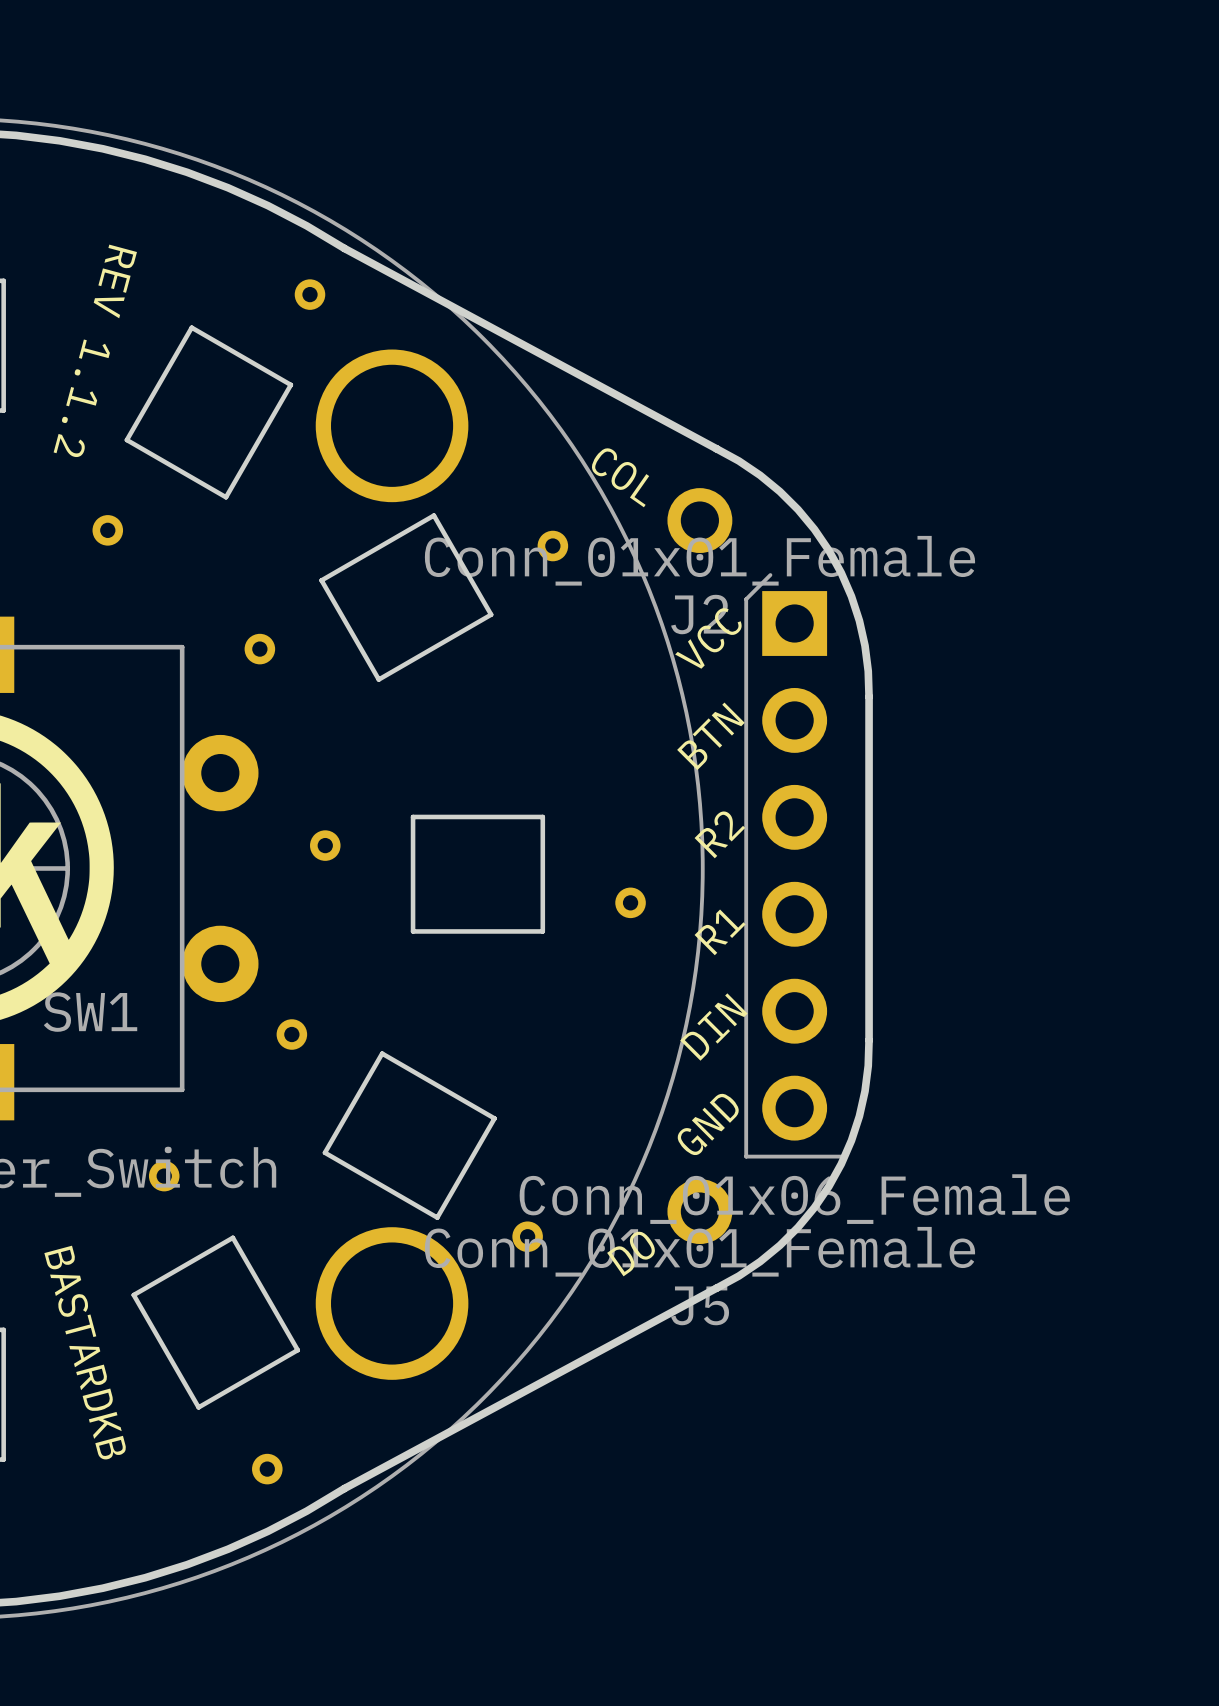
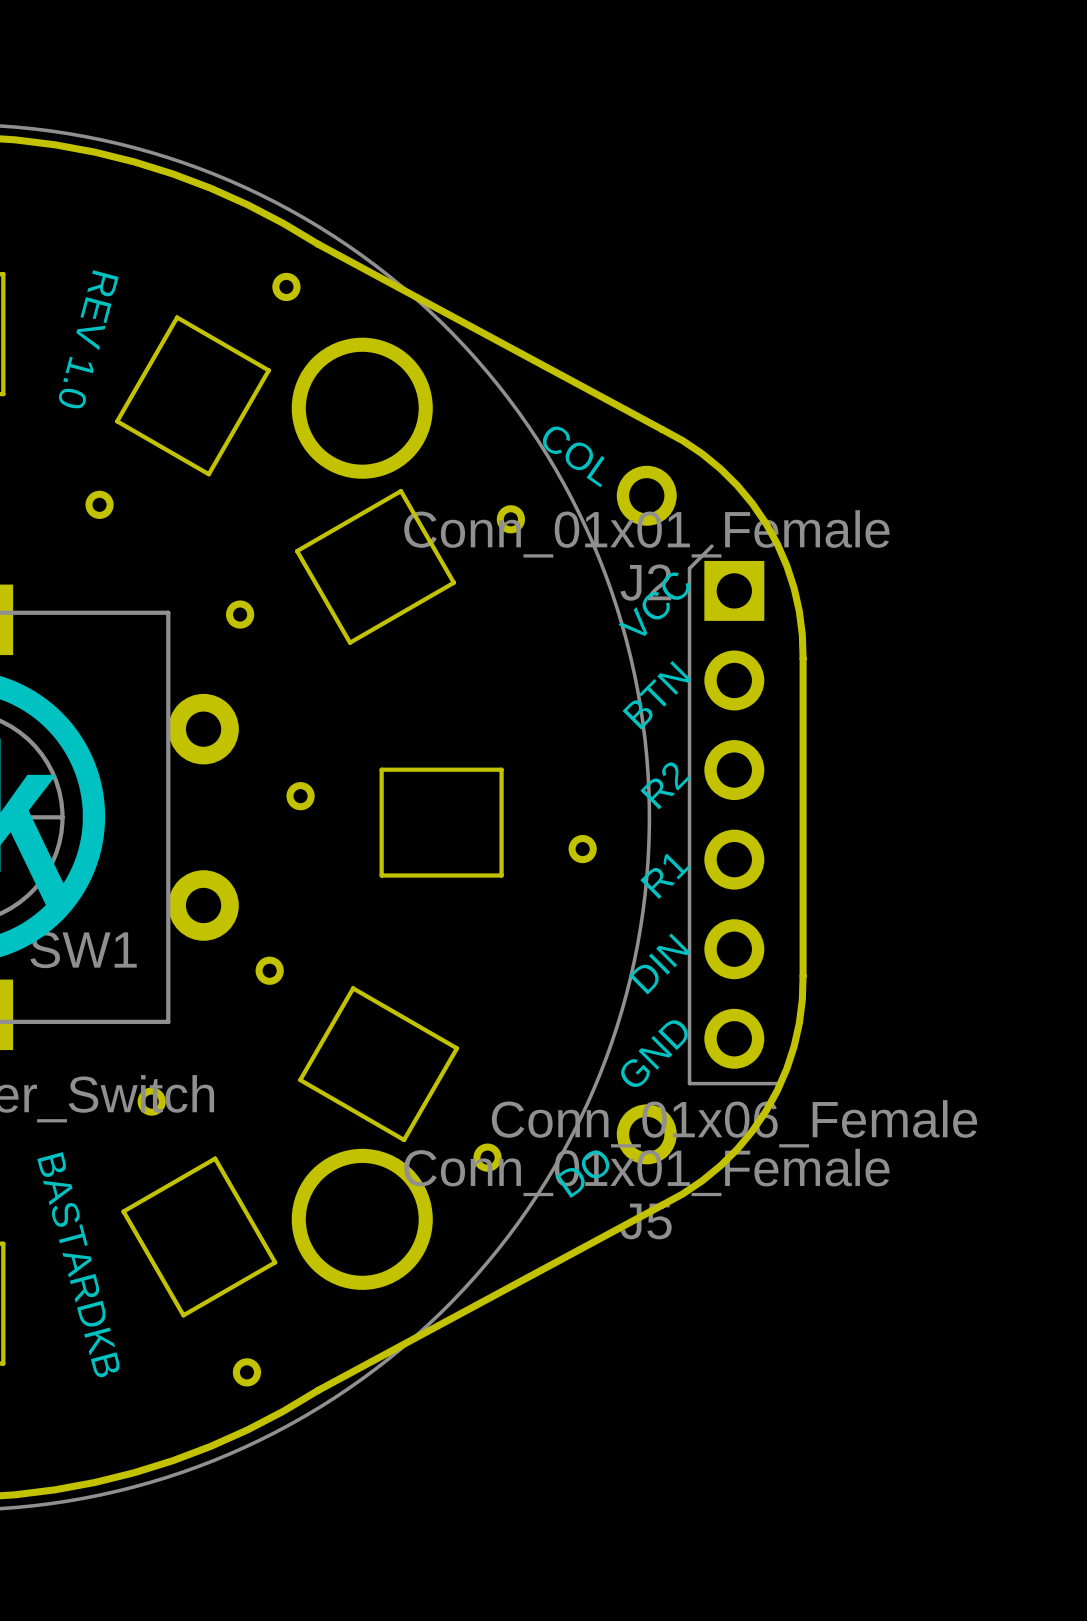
text: REV 1.1.2 (95, 350) -> REV 1.0 (88, 339)

